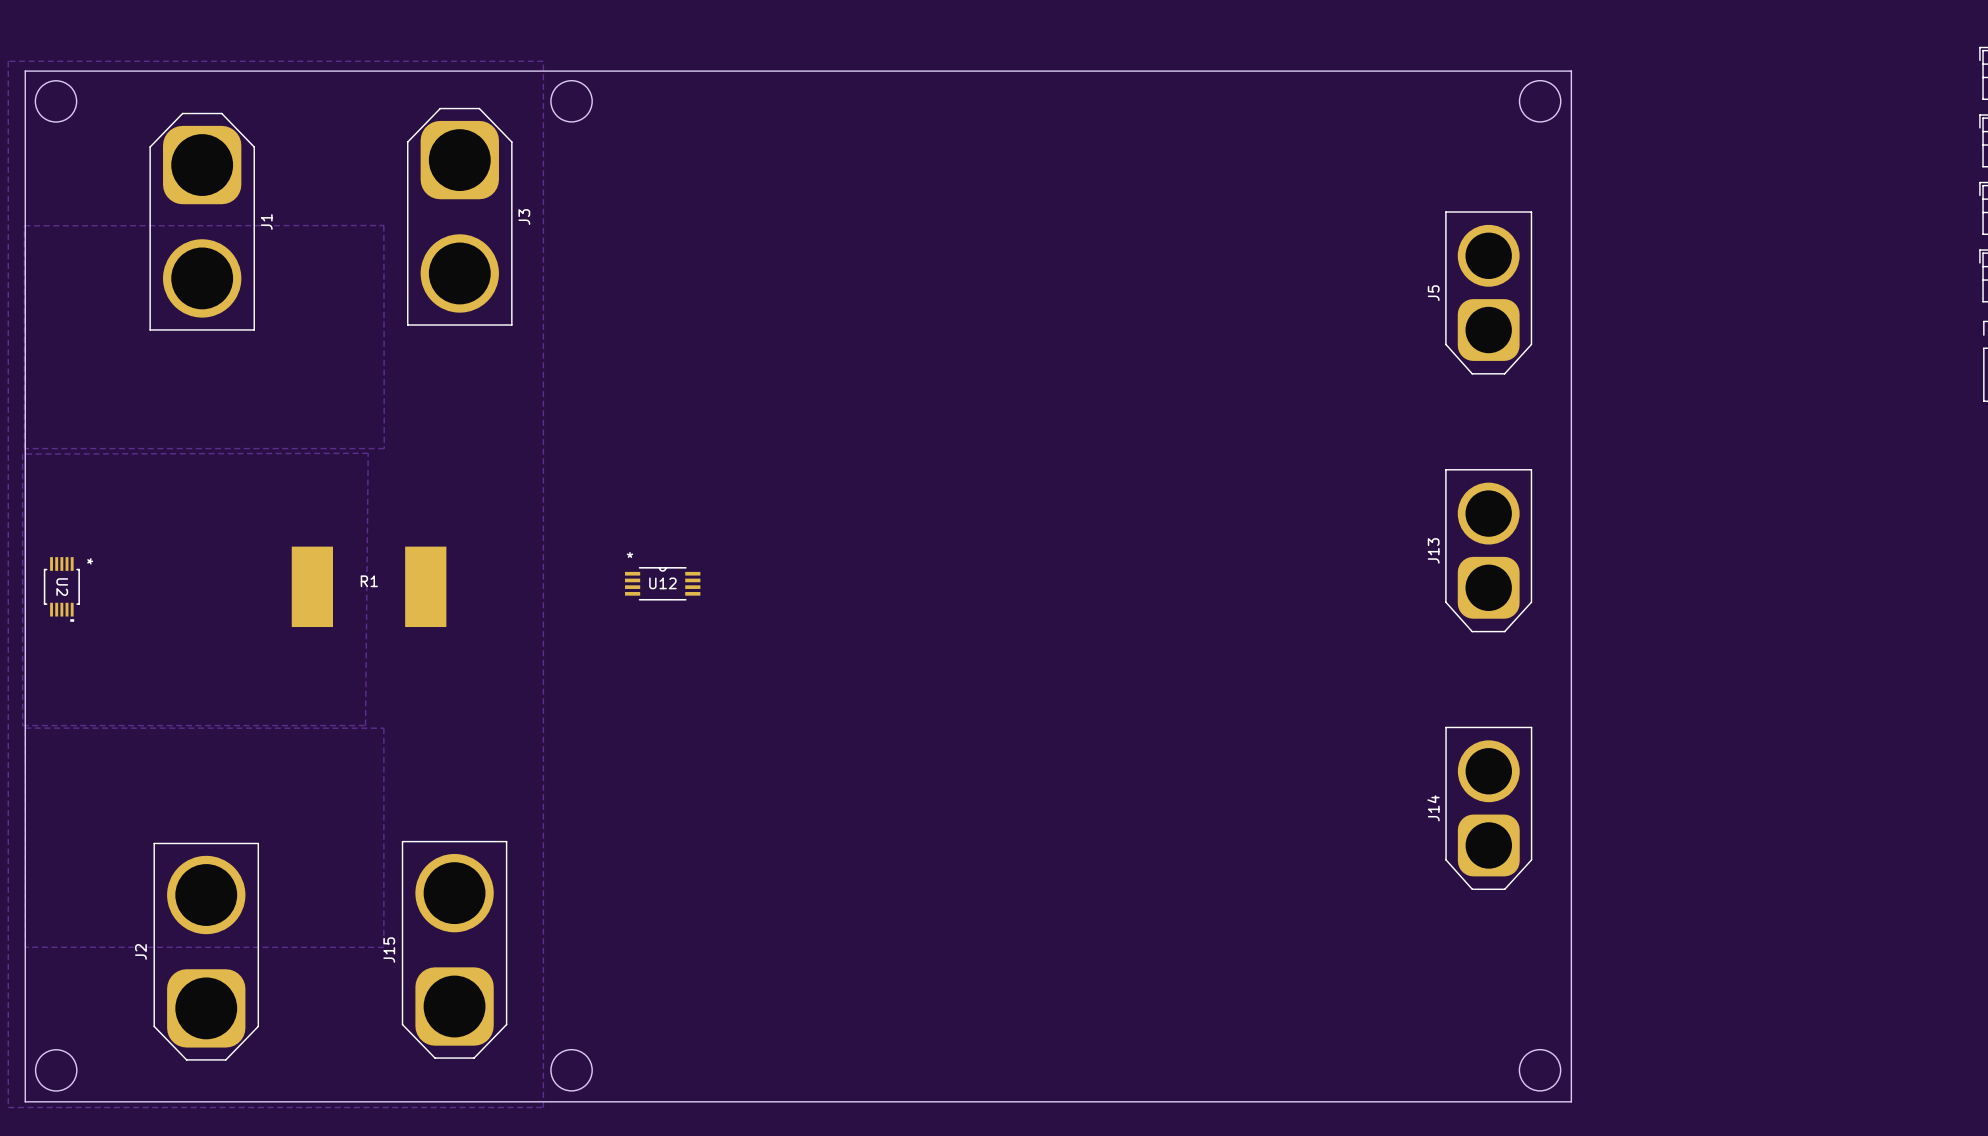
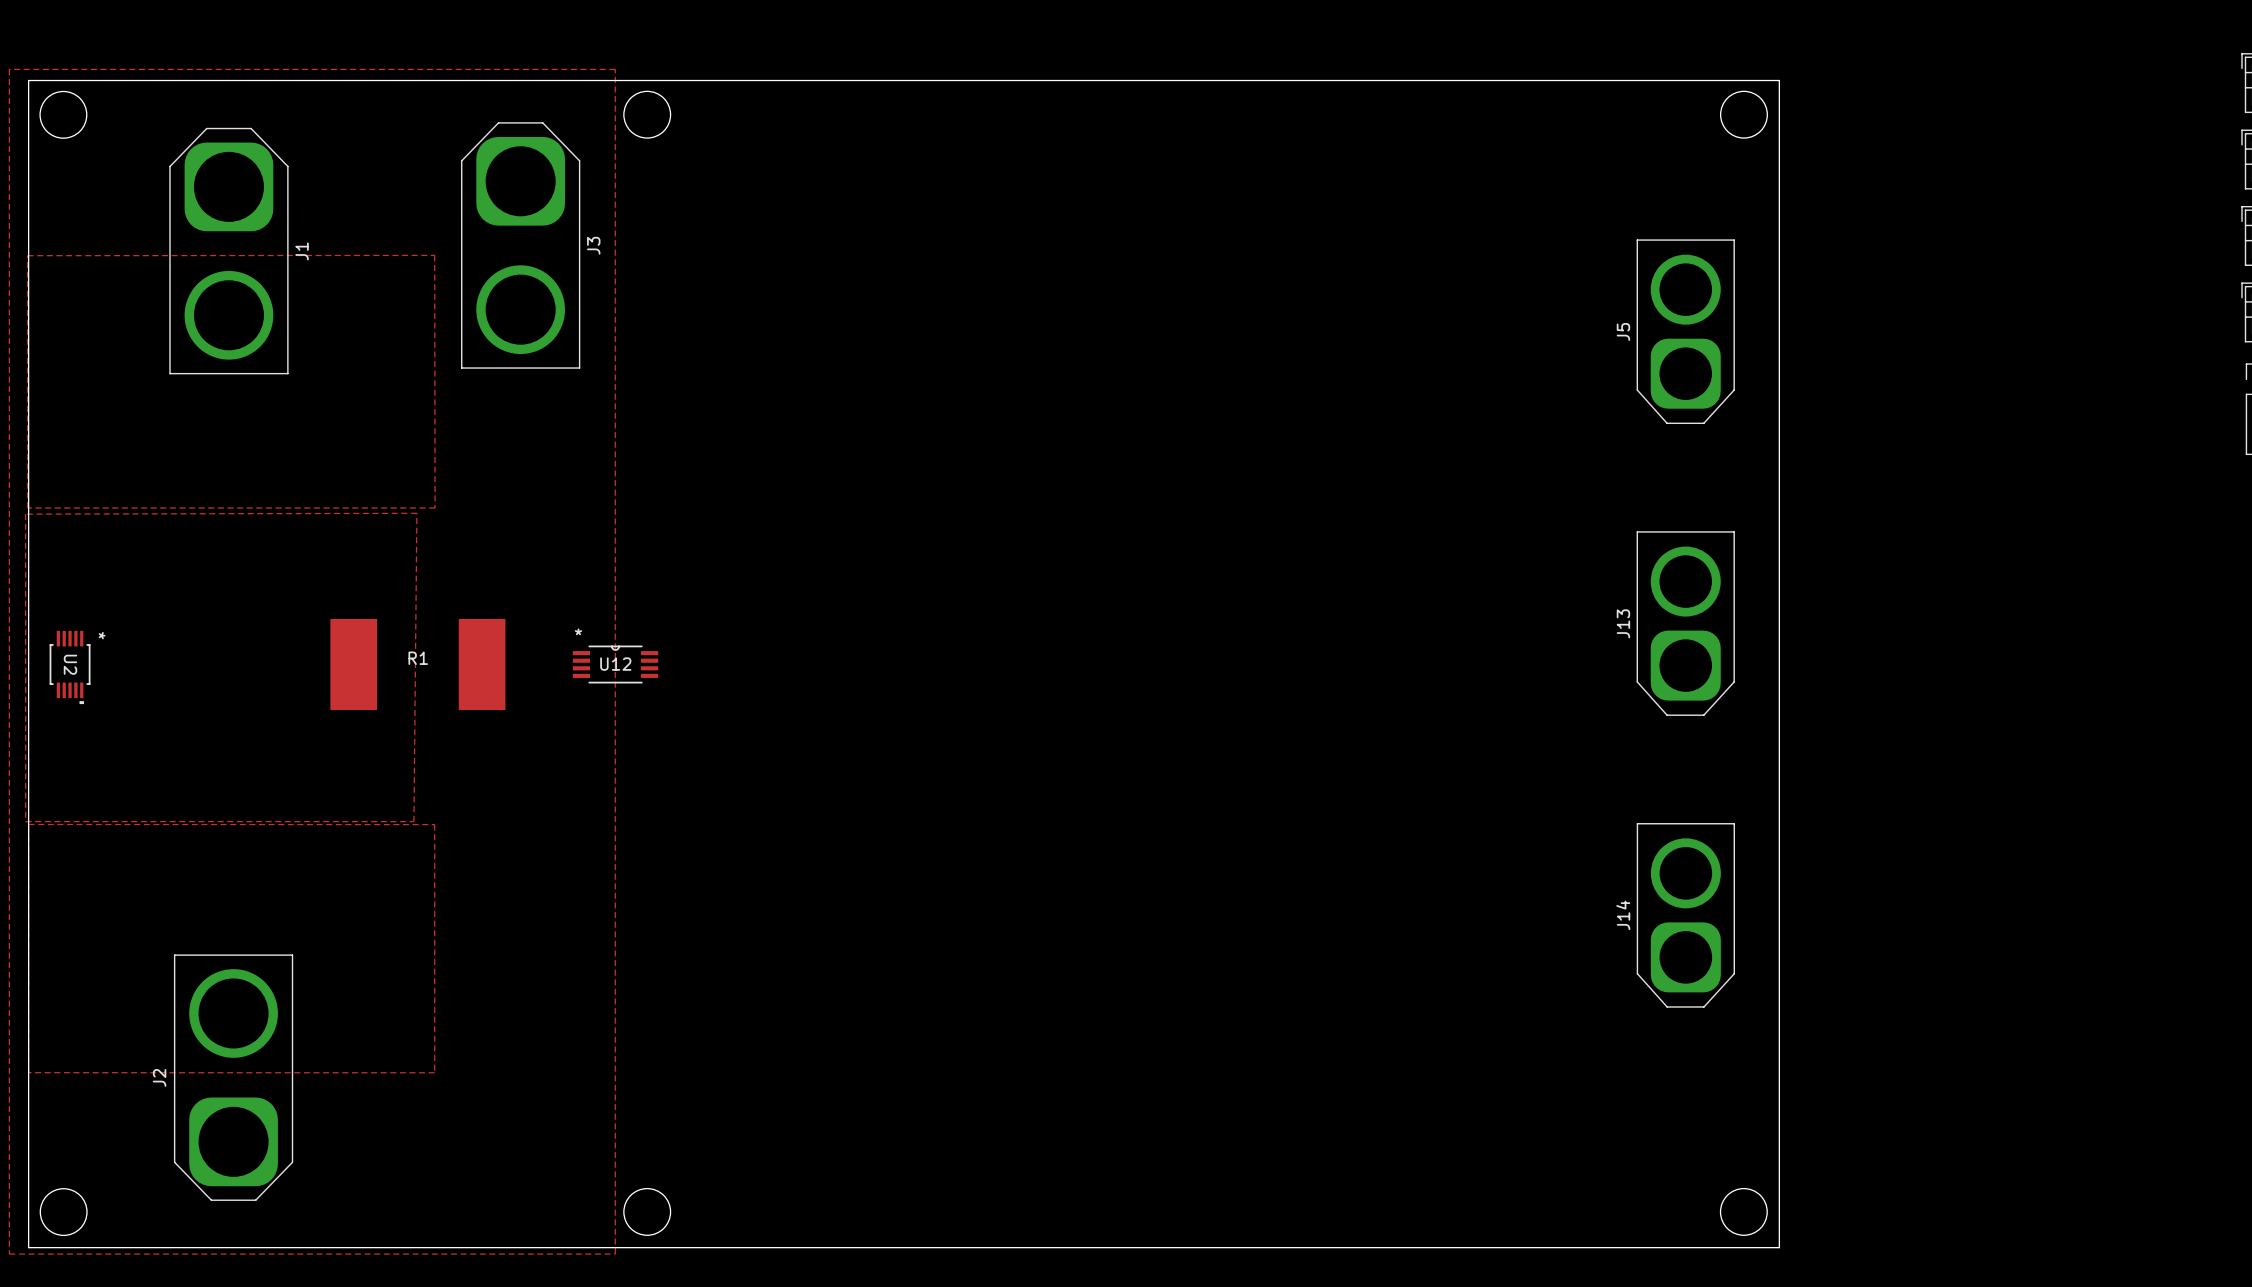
U12 position: (662, 583) -> (615, 664)
J15: (454, 949) -> none

